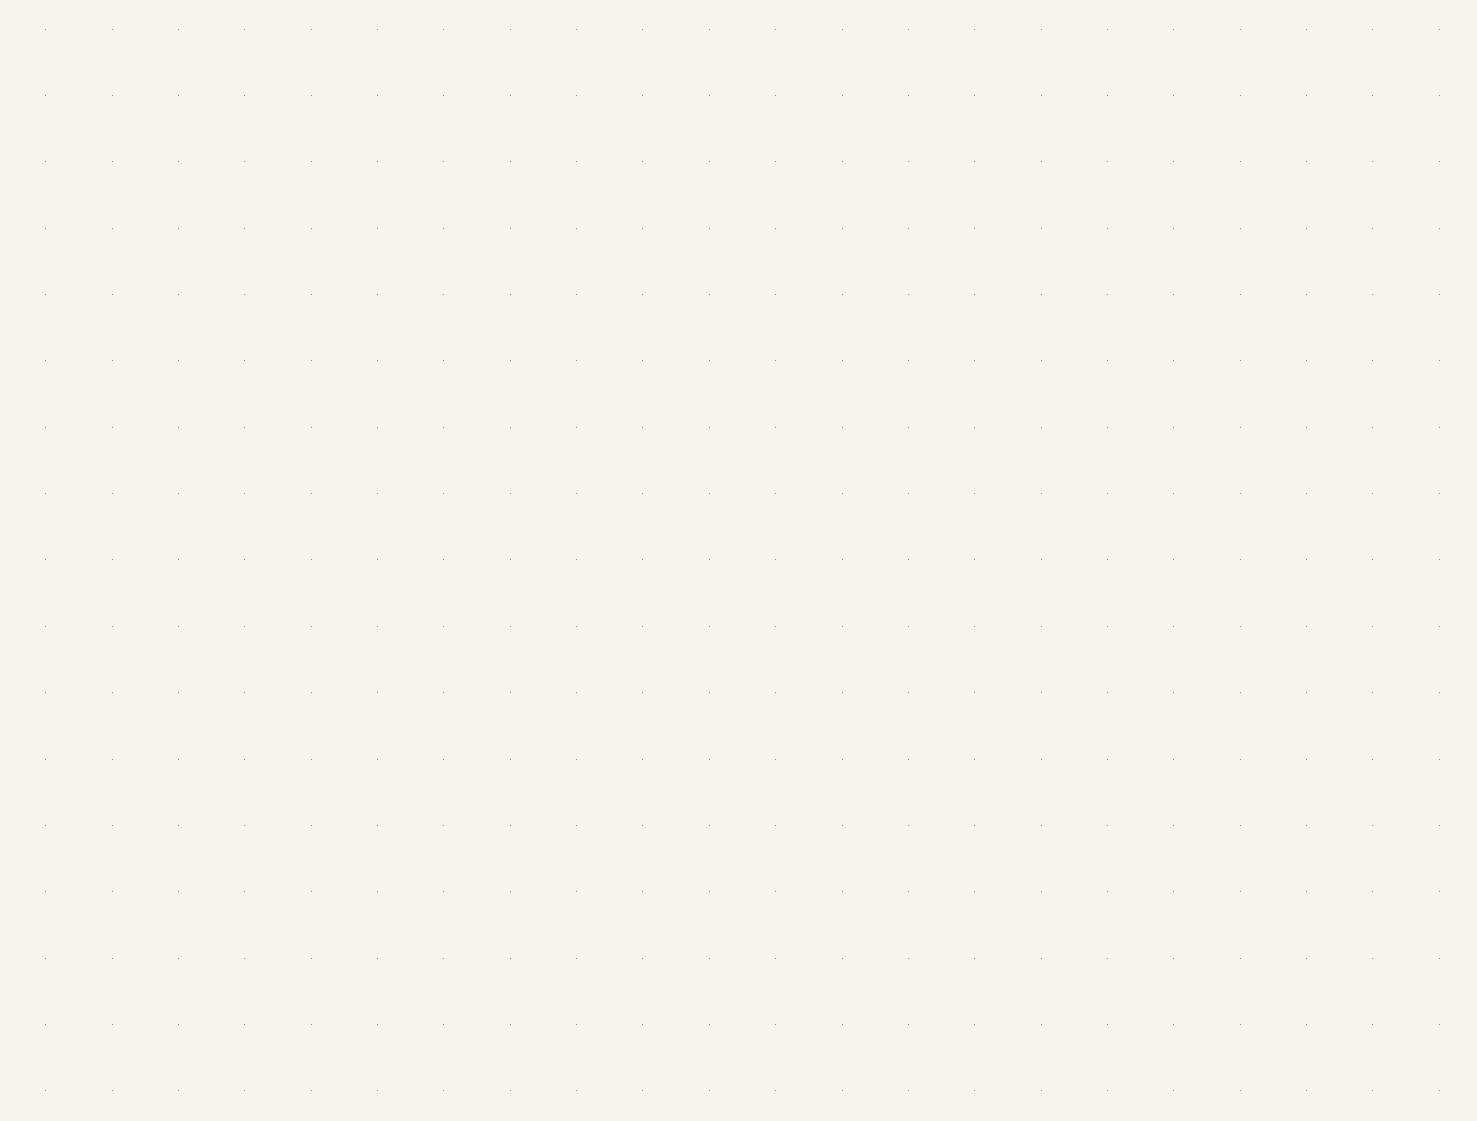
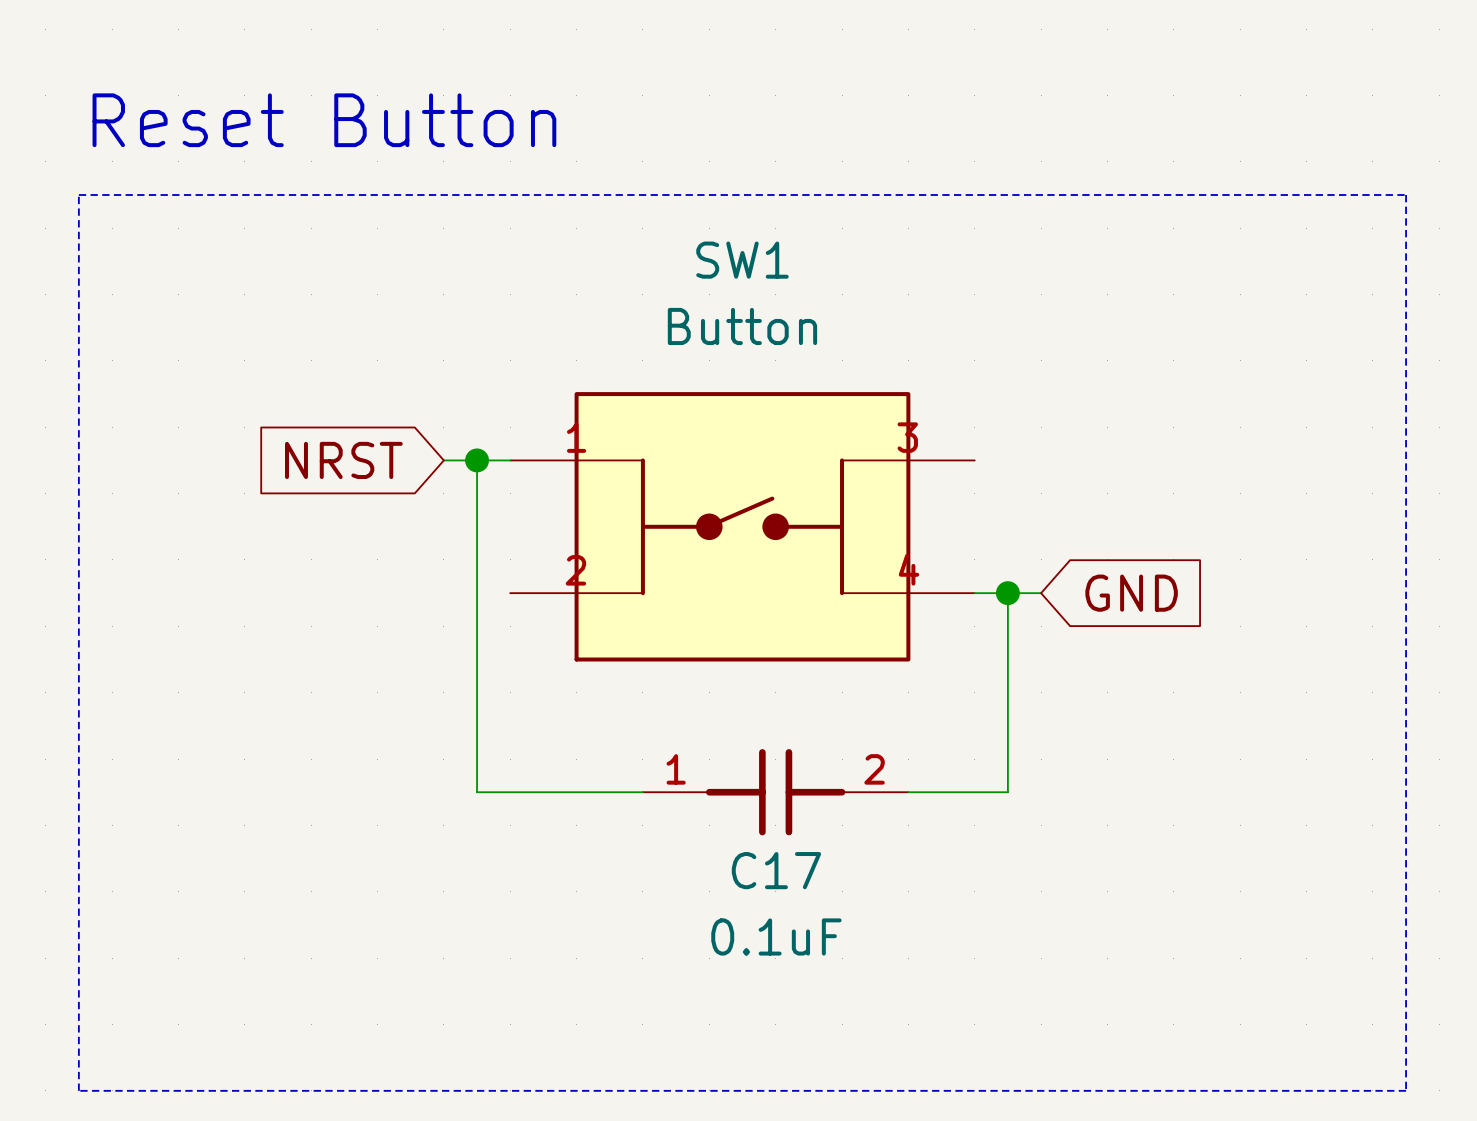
text: none -> Reset Button (324, 120)
line: none -> (78, 195) (1406, 195) (1406, 1090) (78, 1090) (78, 195)
global label: none -> NRST (343, 460)
wire: none -> (443, 460) (510, 460)
wire: none -> (477, 460) (477, 792) (642, 792)
junction: none -> (477, 460)
SW1: none -> Button (742, 526)
wire: none -> (974, 593) (1041, 593)
wire: none -> (1007, 593) (1007, 792) (908, 792)
junction: none -> (1007, 593)
global label: none -> GND (1131, 593)
C17: none -> 0.1uF (775, 792)

